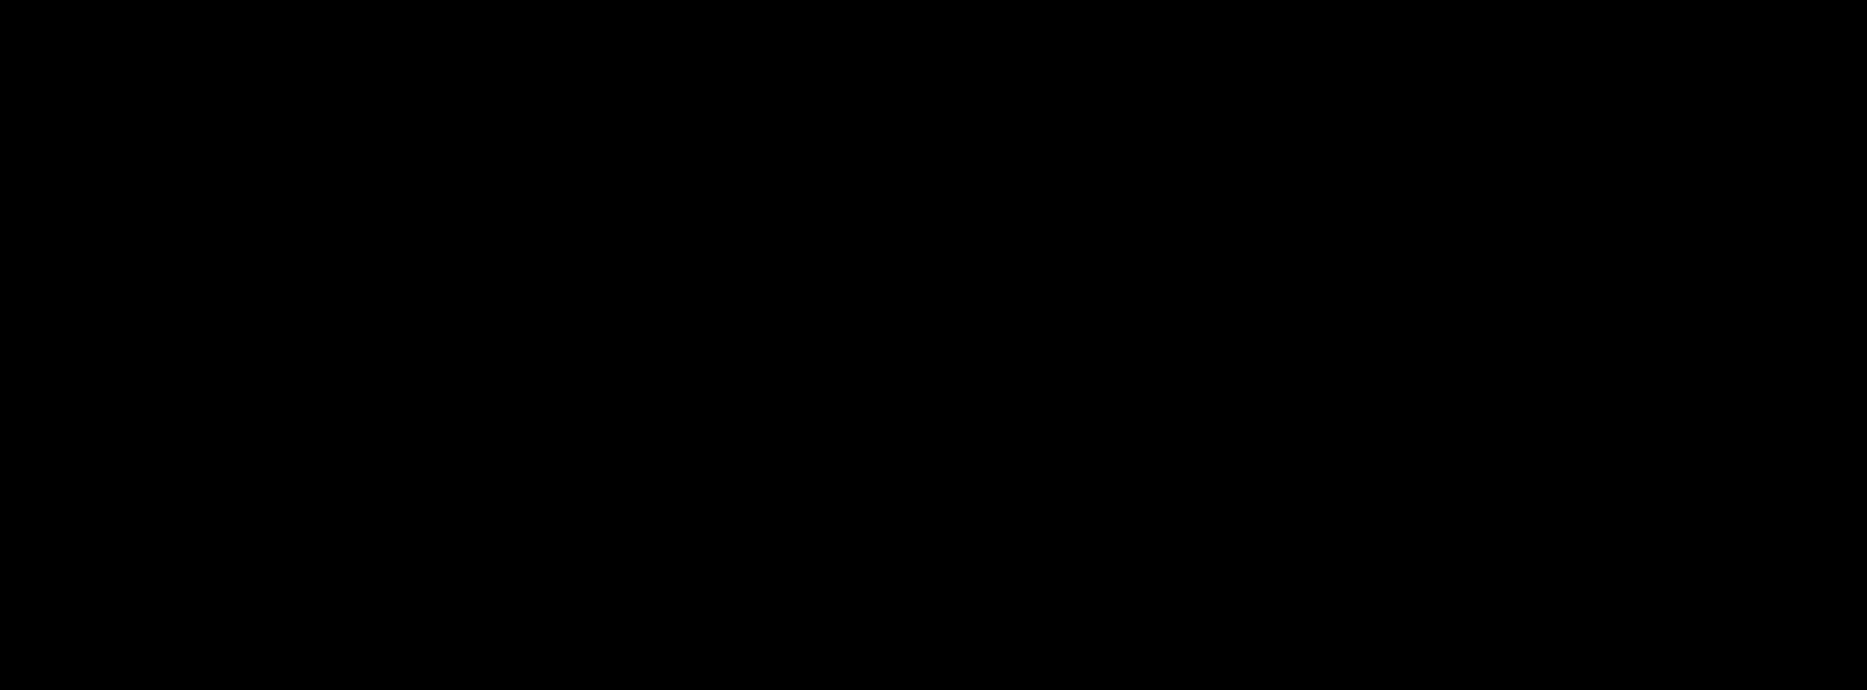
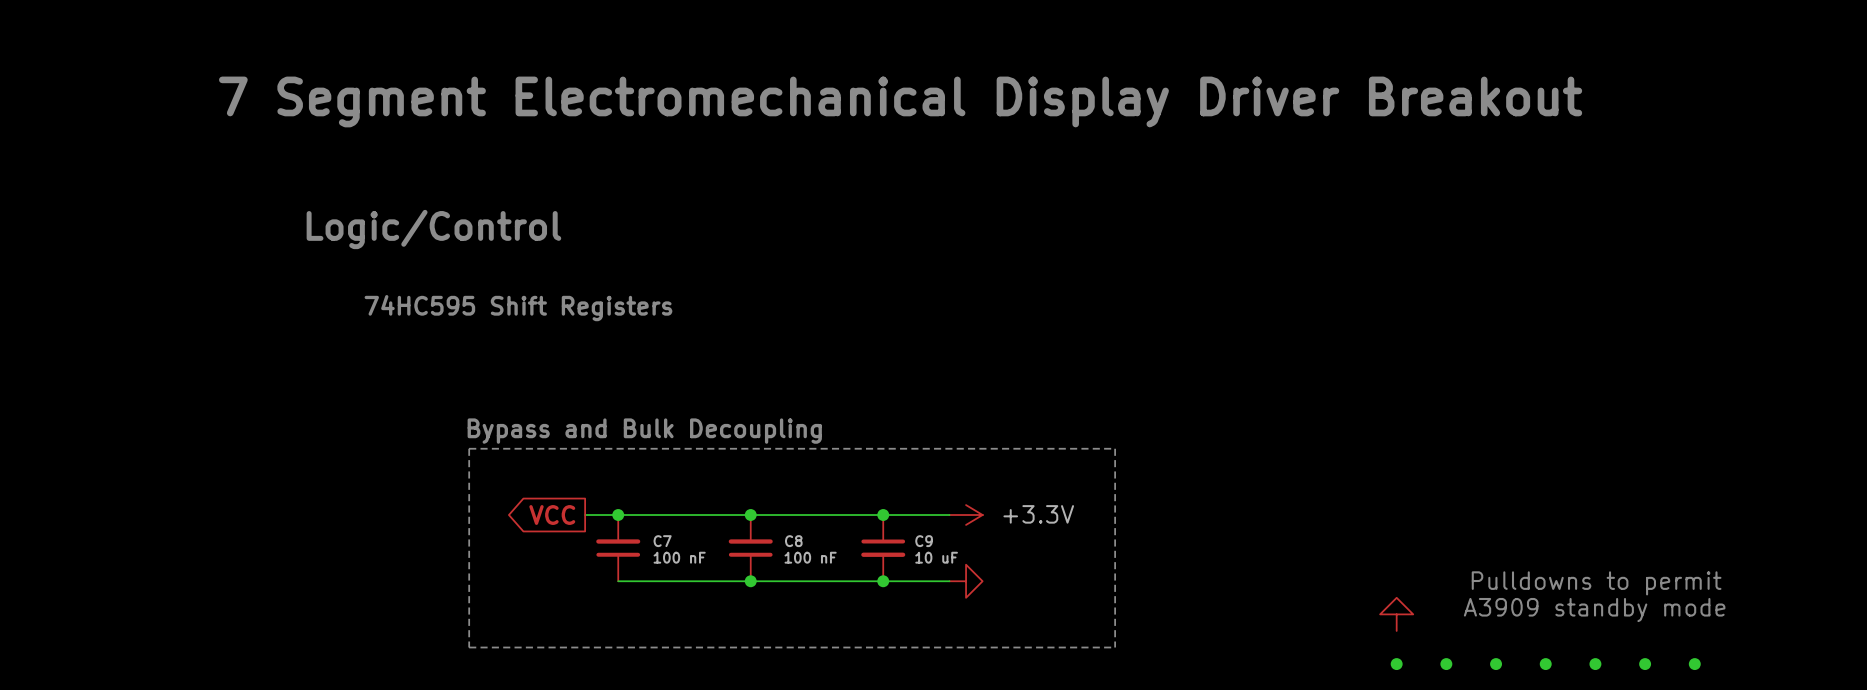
text: none -> 7 Segment Electromechanical Display Driver Breakout (900, 101)
text: none -> Logic/Control (433, 229)
text: none -> 74HC595 Shift Registers (518, 308)
text: none -> Bypass and Bulk Decoupling (644, 431)
line: none -> (469, 448) (1115, 448) (1115, 647) (469, 647) (469, 448)
global label: none -> VCC (552, 515)
wire: none -> (585, 515) (949, 515)
junction: none -> (618, 515)
junction: none -> (750, 515)
junction: none -> (883, 515)
power symbol: none -> +3.3V (966, 515)
C7: none -> 100 nF (618, 548)
C8: none -> 100 nF (750, 548)
C9: none -> 10 uF (883, 548)
wire: none -> (618, 581) (949, 581)
junction: none -> (750, 581)
junction: none -> (883, 581)
power symbol: none -> (966, 581)
text: none -> Pulldowns to permit (1596, 583)
text: none -> A3909 standby mode (1594, 610)
power symbol: none -> (1396, 614)
junction: none -> (1396, 664)
junction: none -> (1446, 664)
junction: none -> (1496, 664)
junction: none -> (1545, 664)
junction: none -> (1595, 664)
junction: none -> (1645, 664)
junction: none -> (1694, 664)

